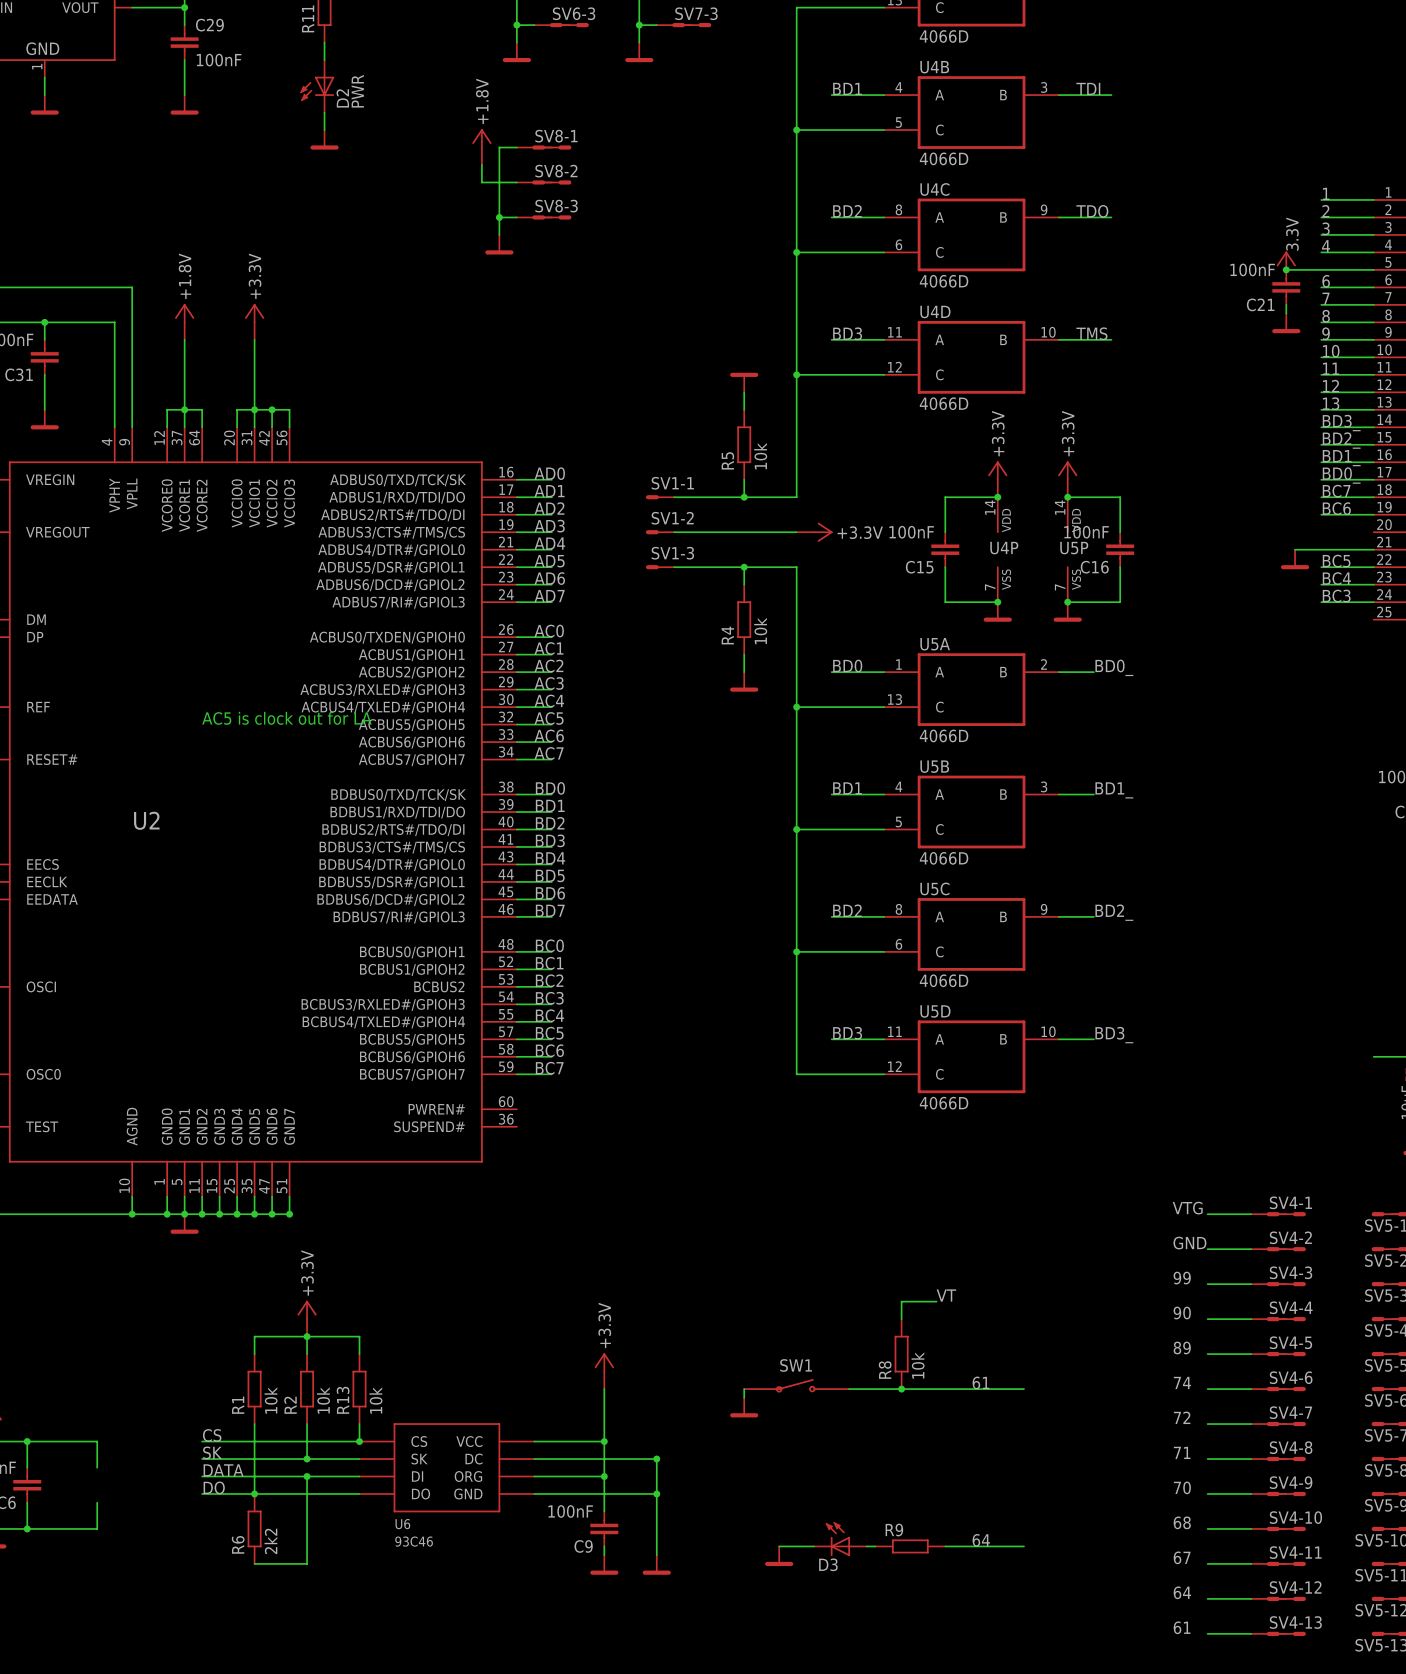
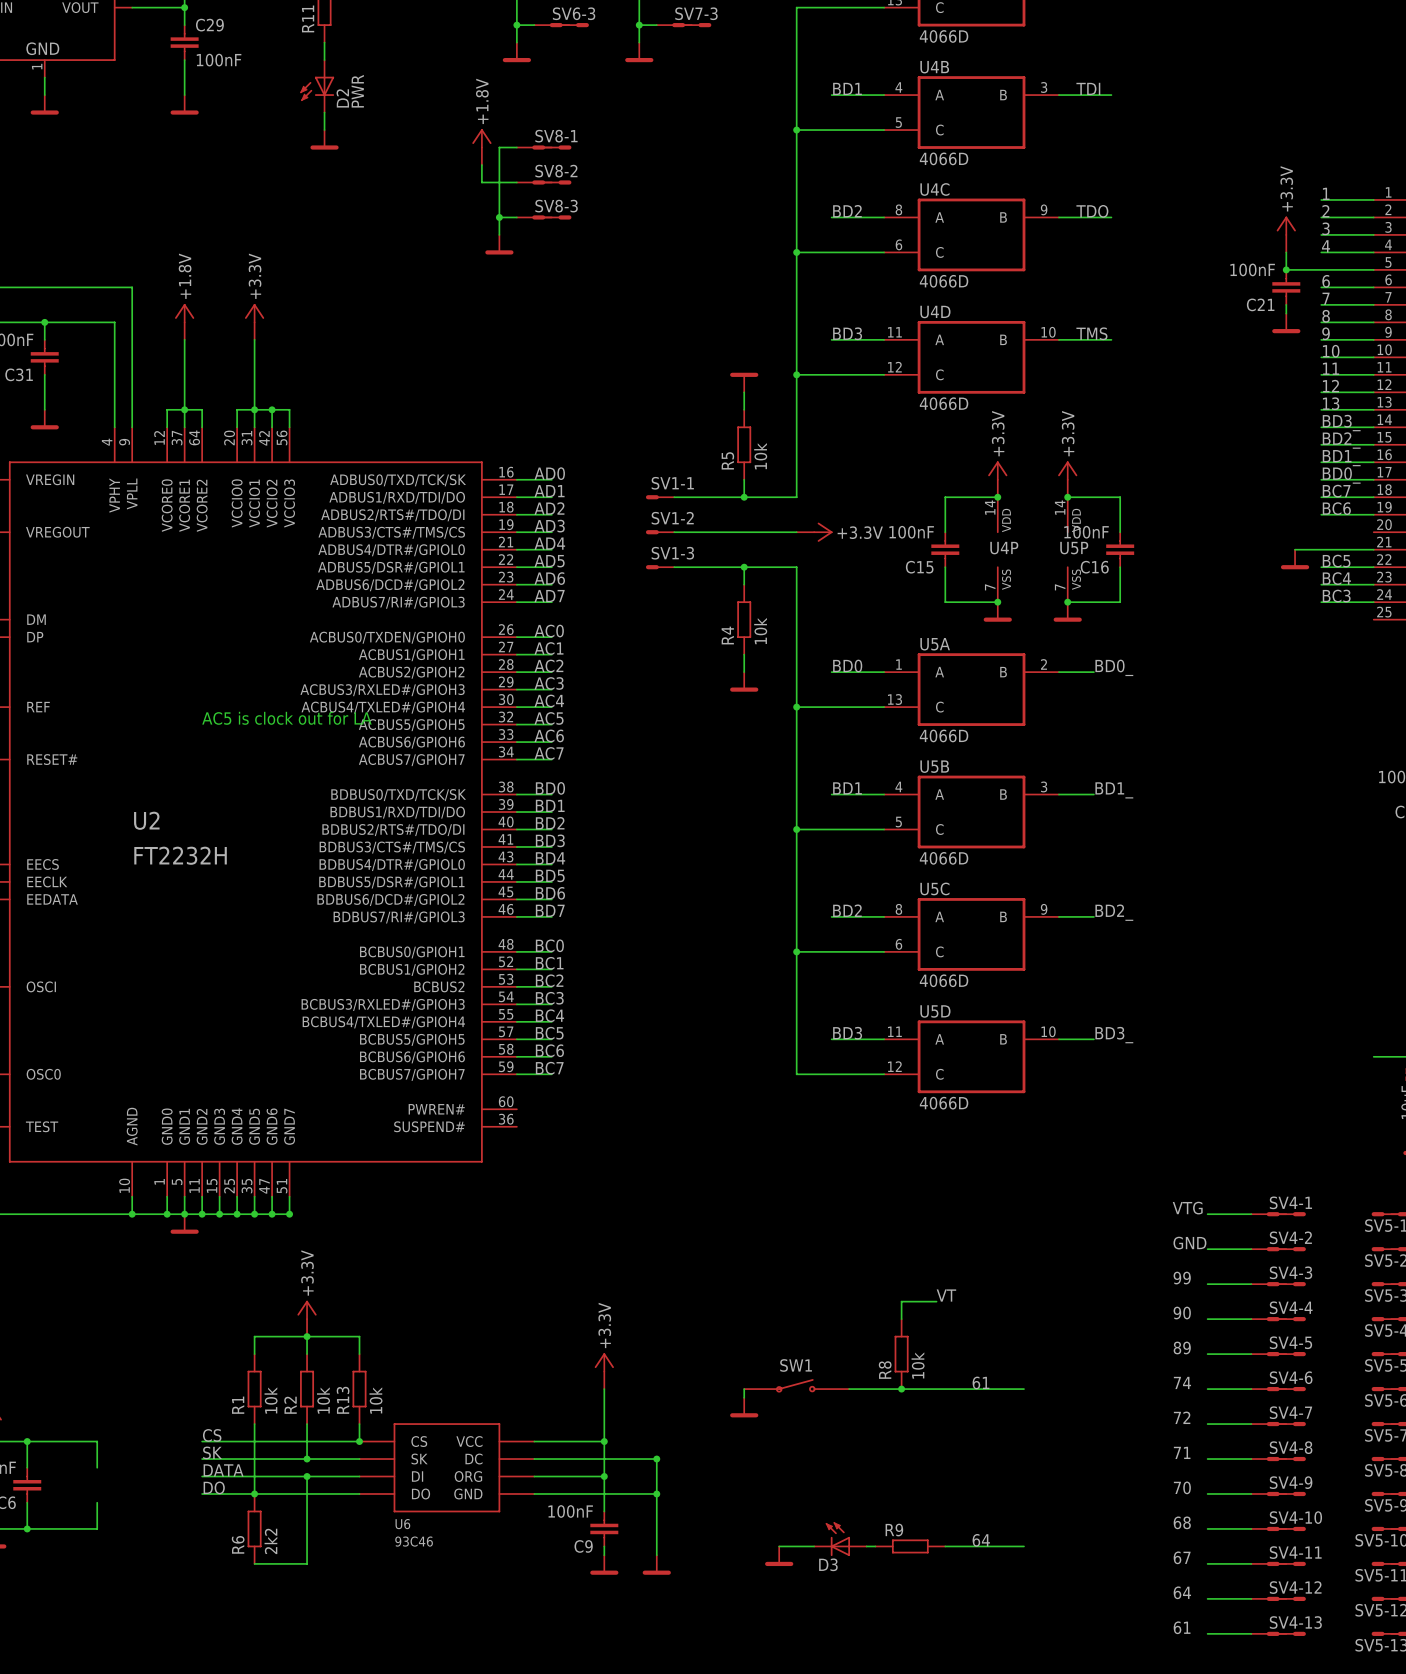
power symbol: none -> +3.3V (1286, 234)
power symbol: 3.3V (1286, 260) -> none
U2 value: none -> FT2232H (180, 855)

